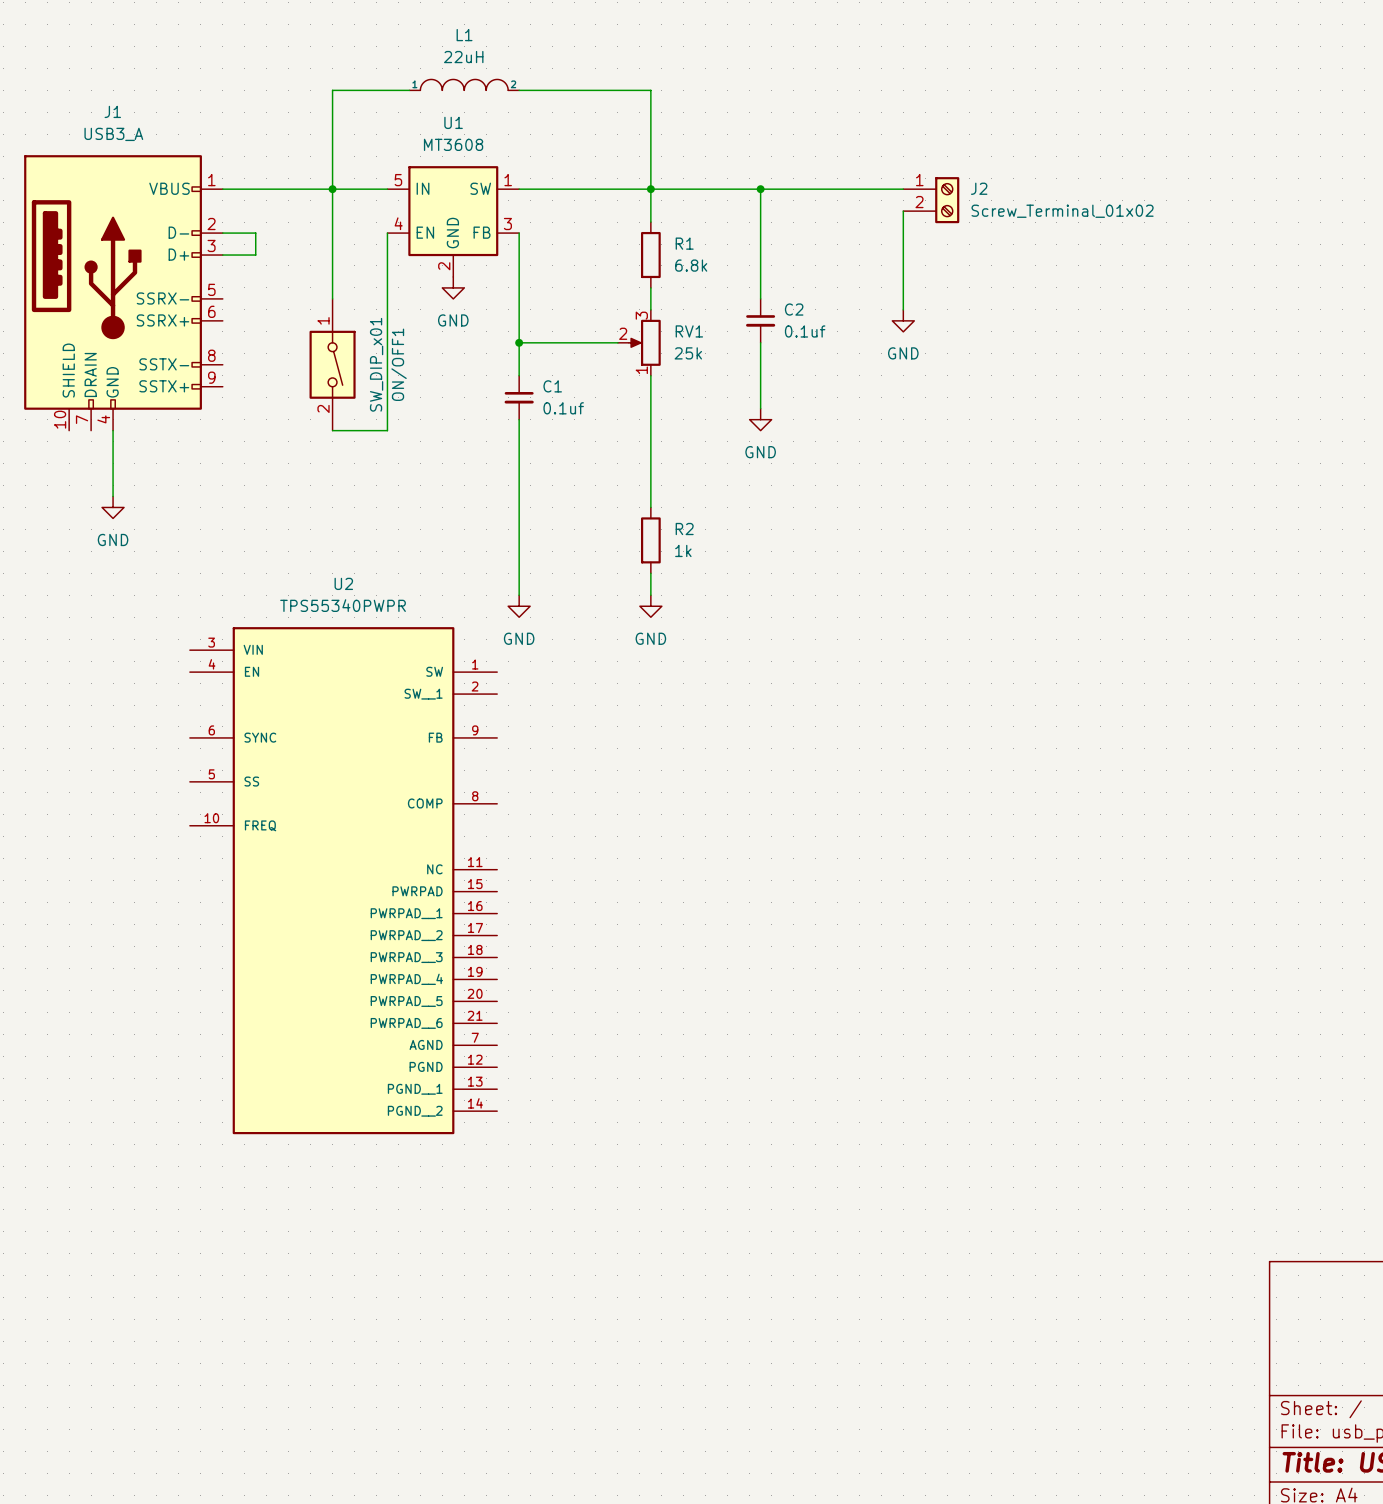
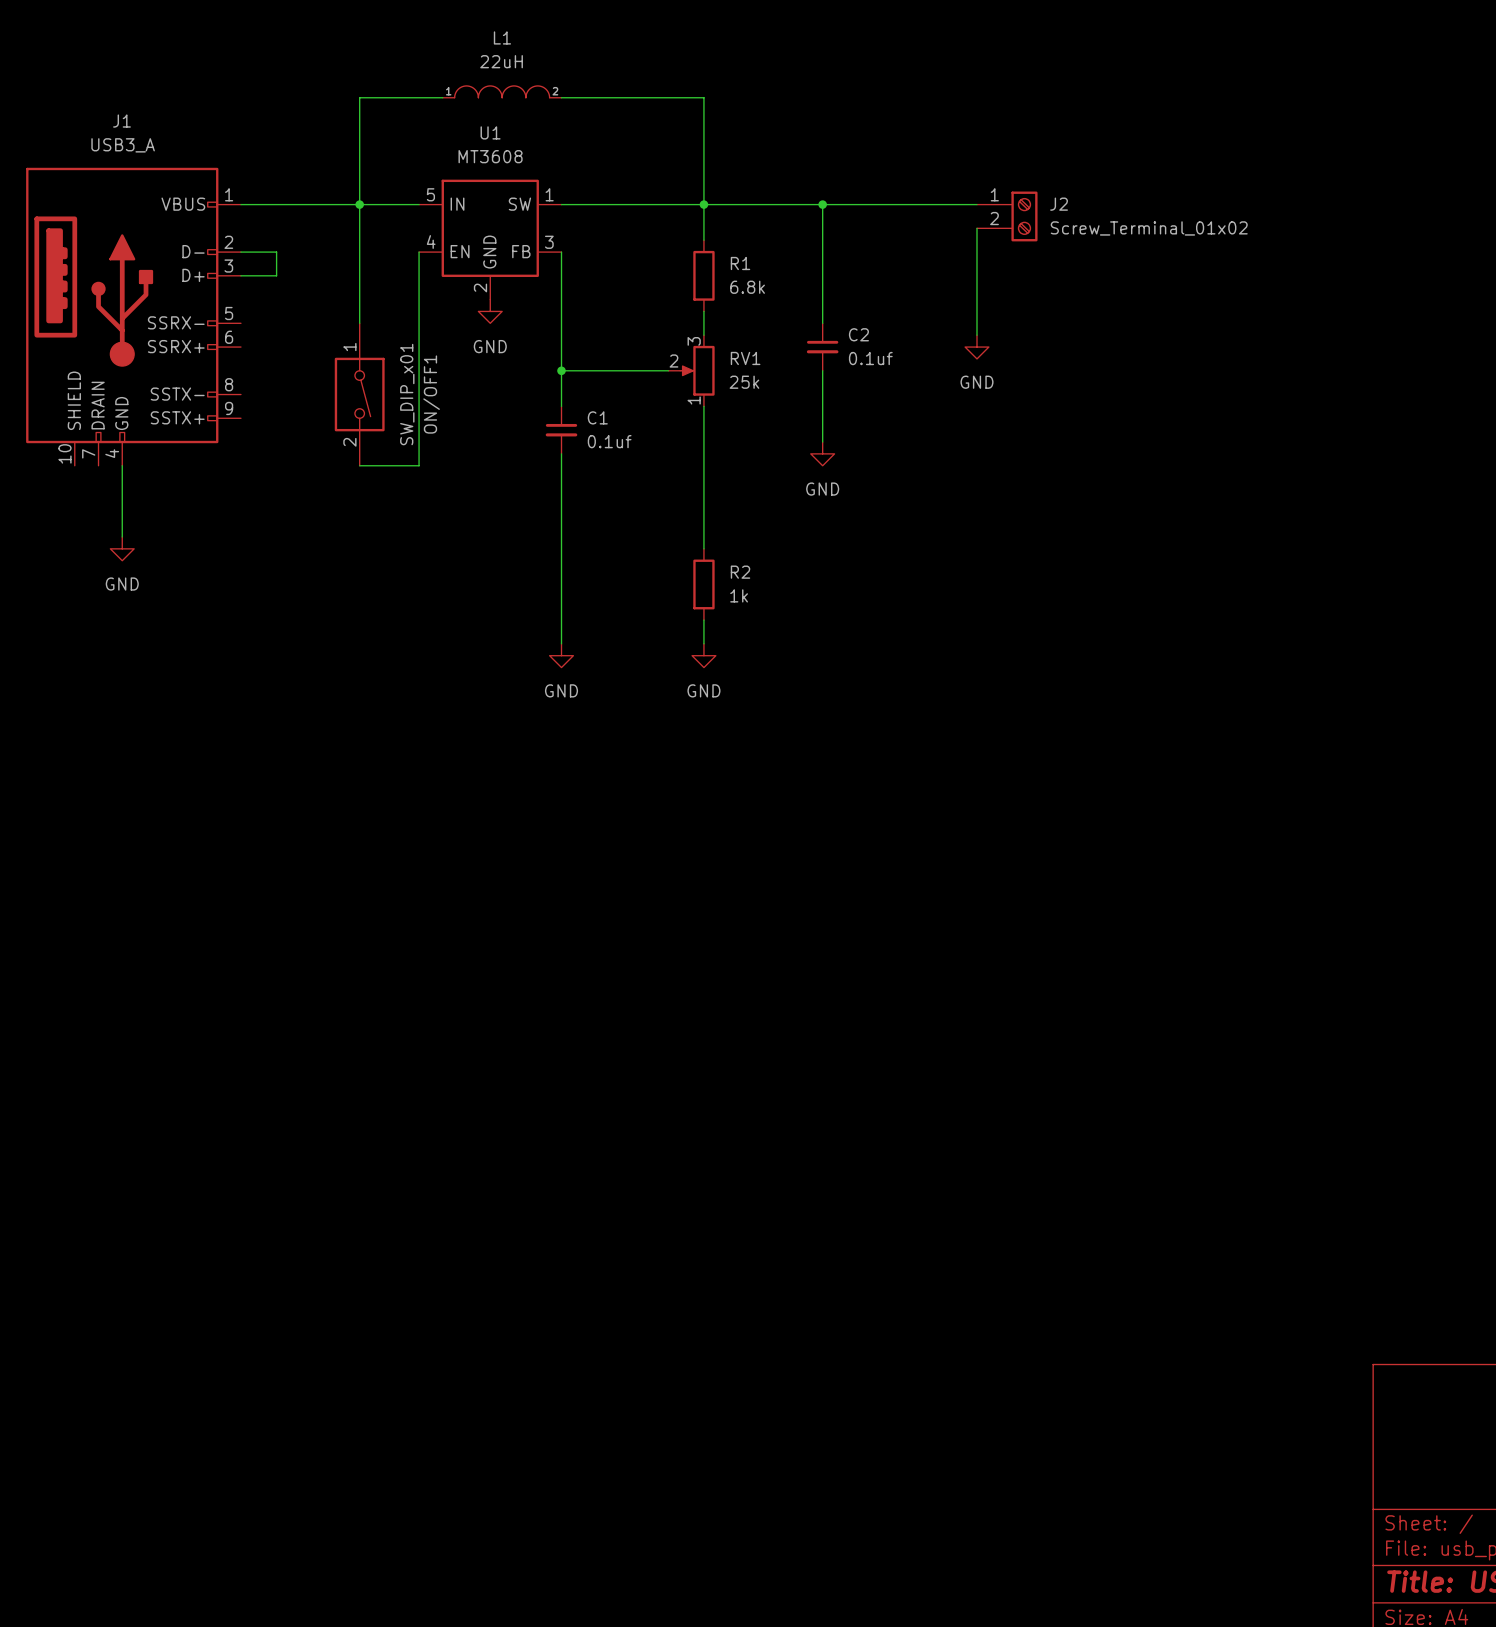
U2: TPS55340PWPR (343, 880) -> none

